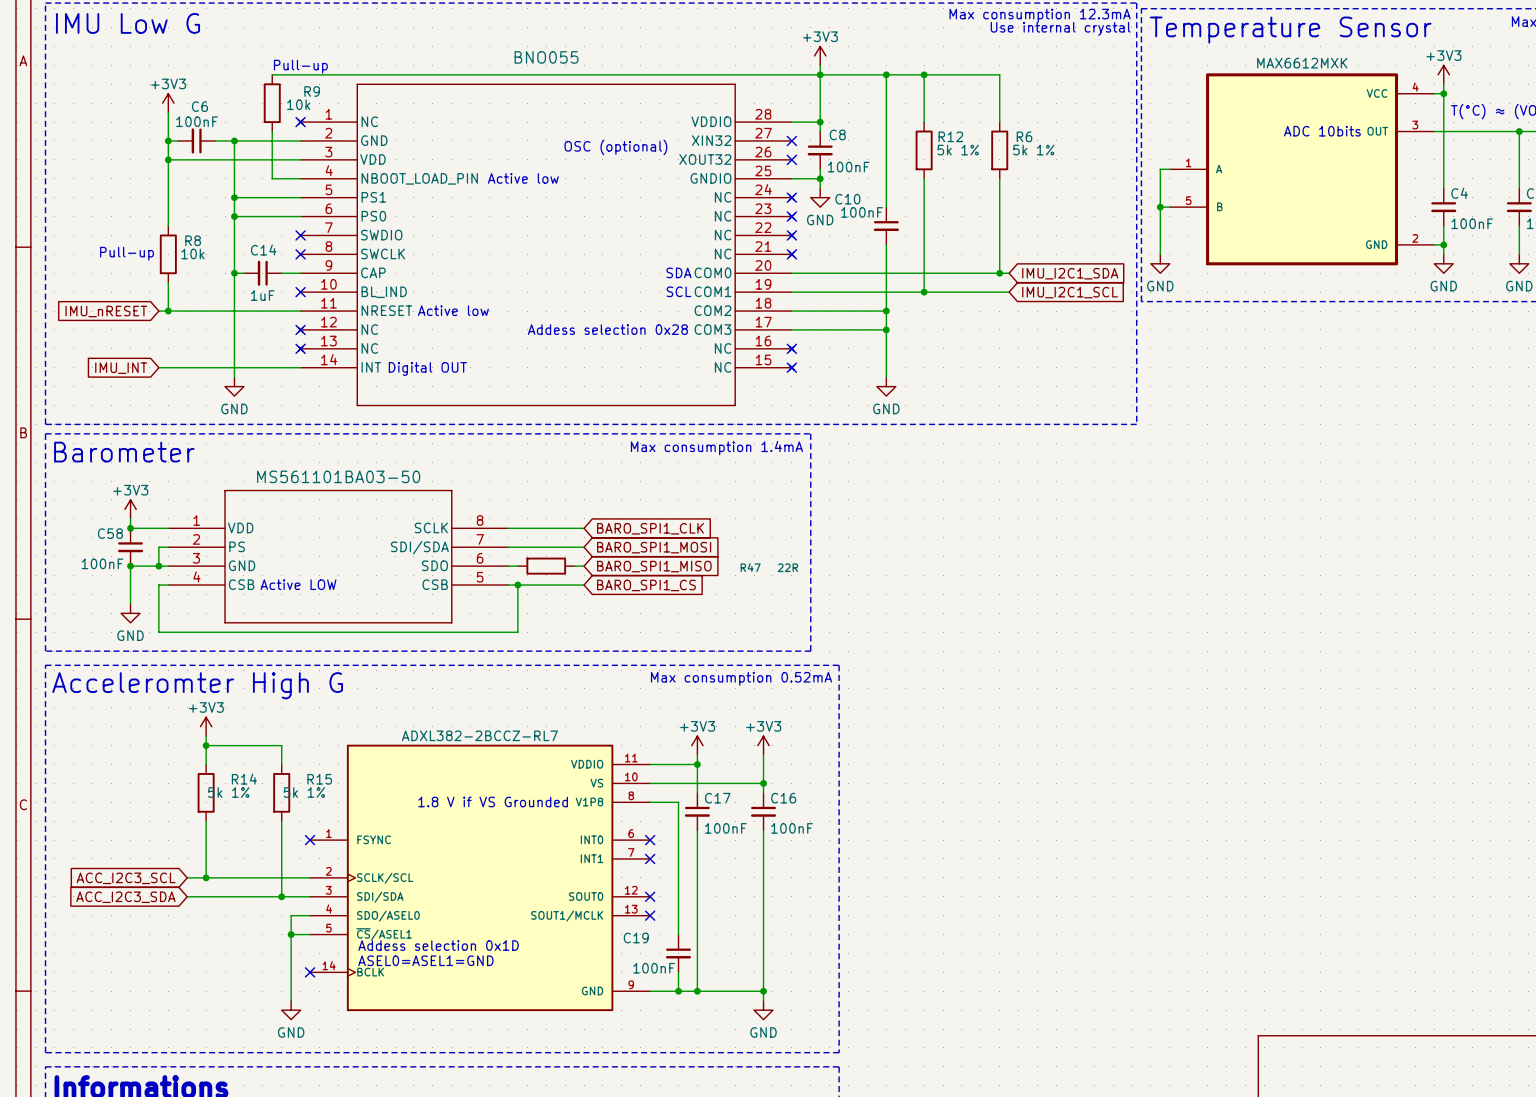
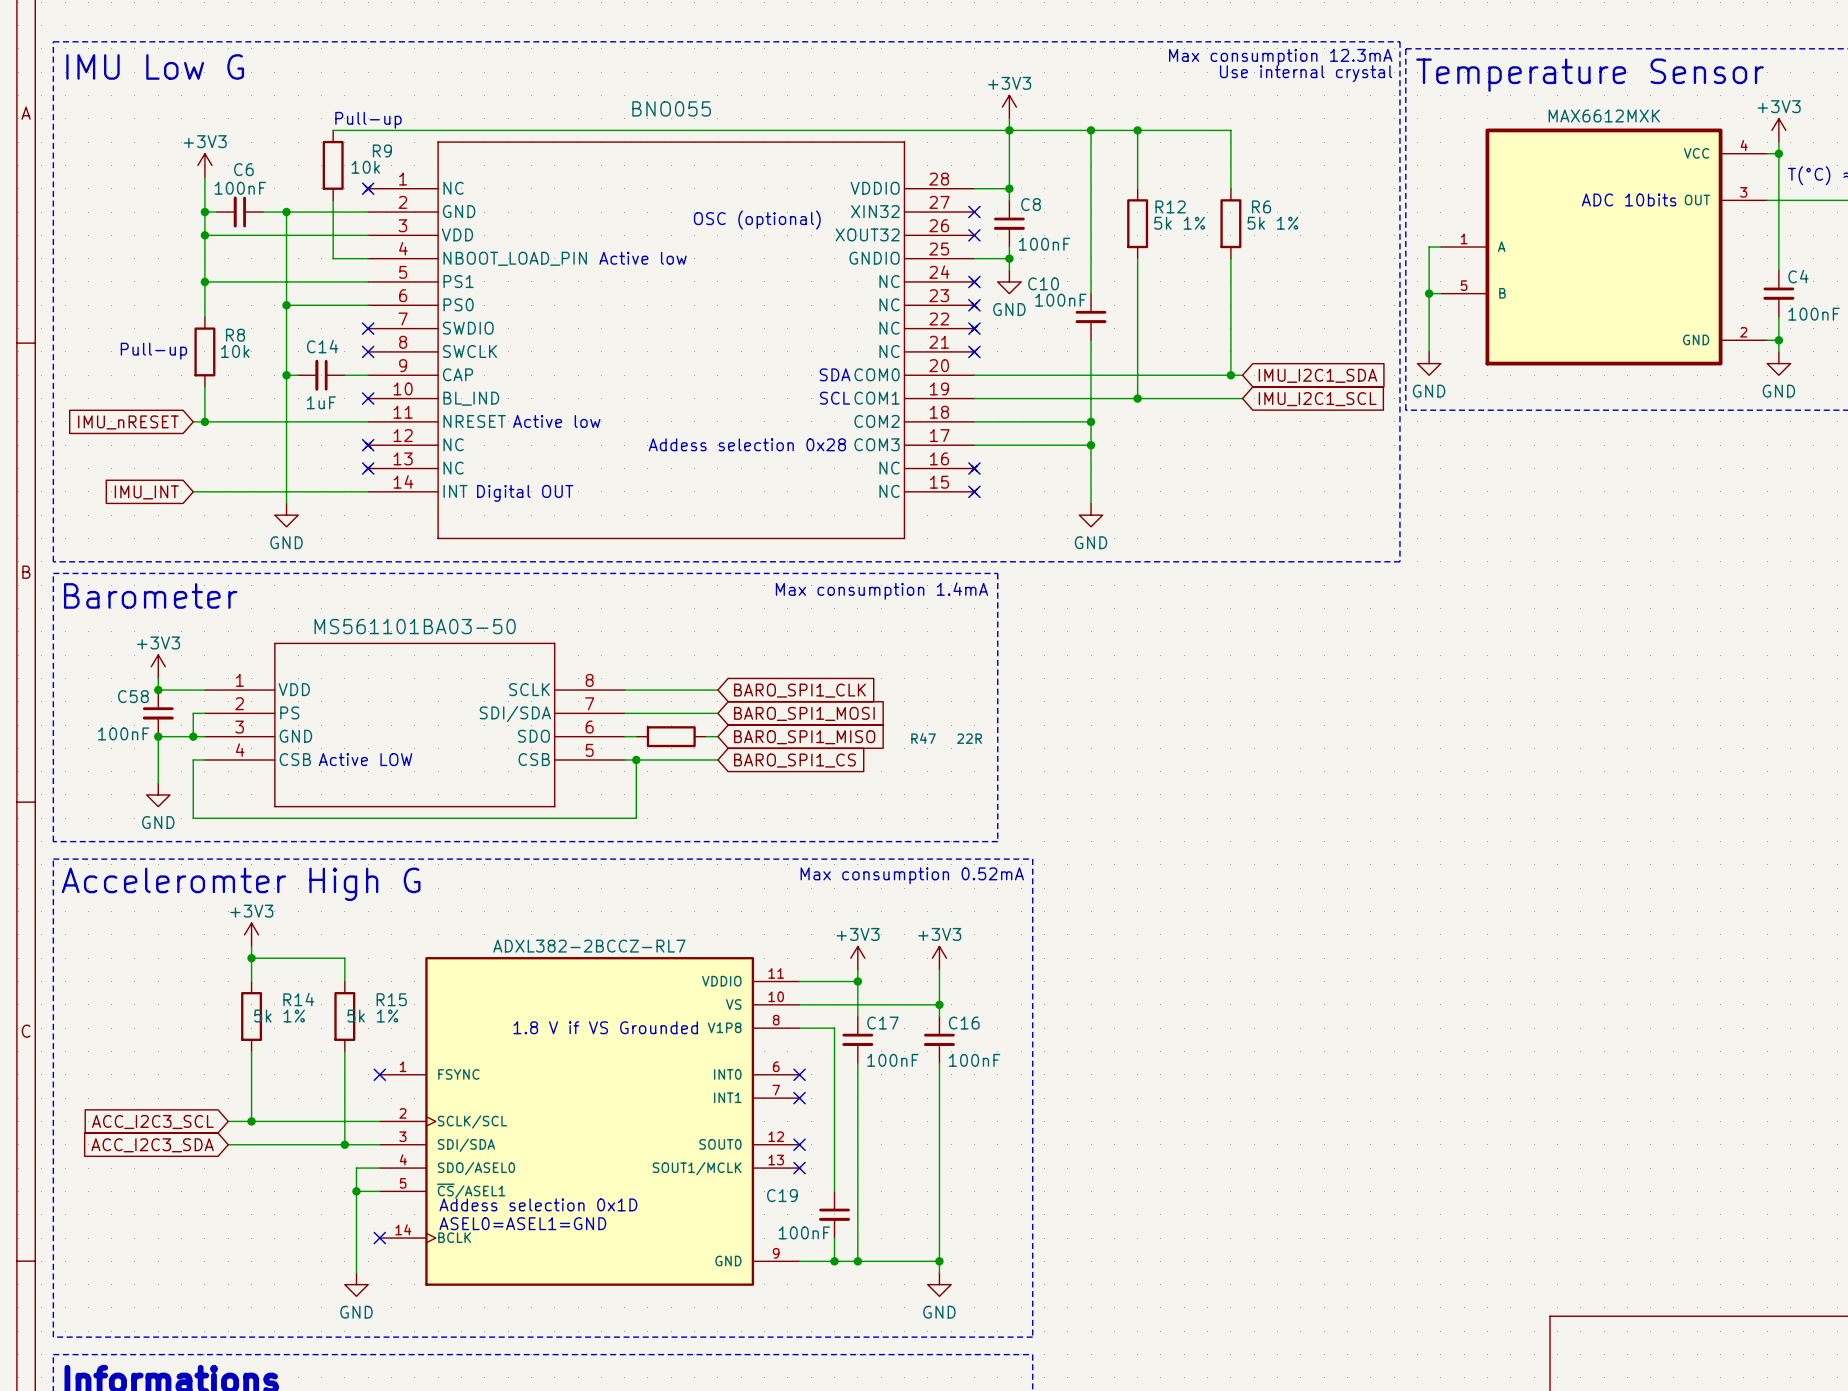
wire: none -> (204, 281) (286, 281)
junction: none -> (204, 281)
junction: (234, 197) -> none

